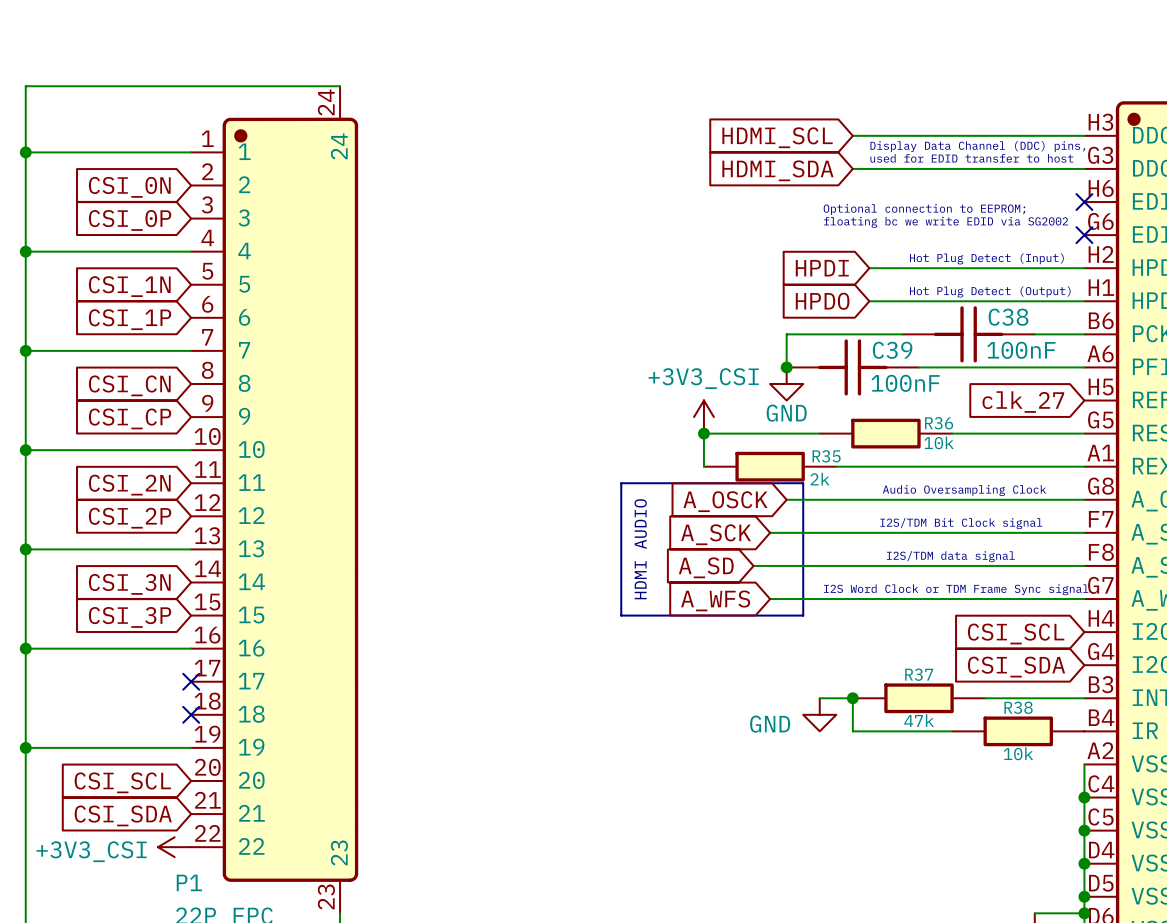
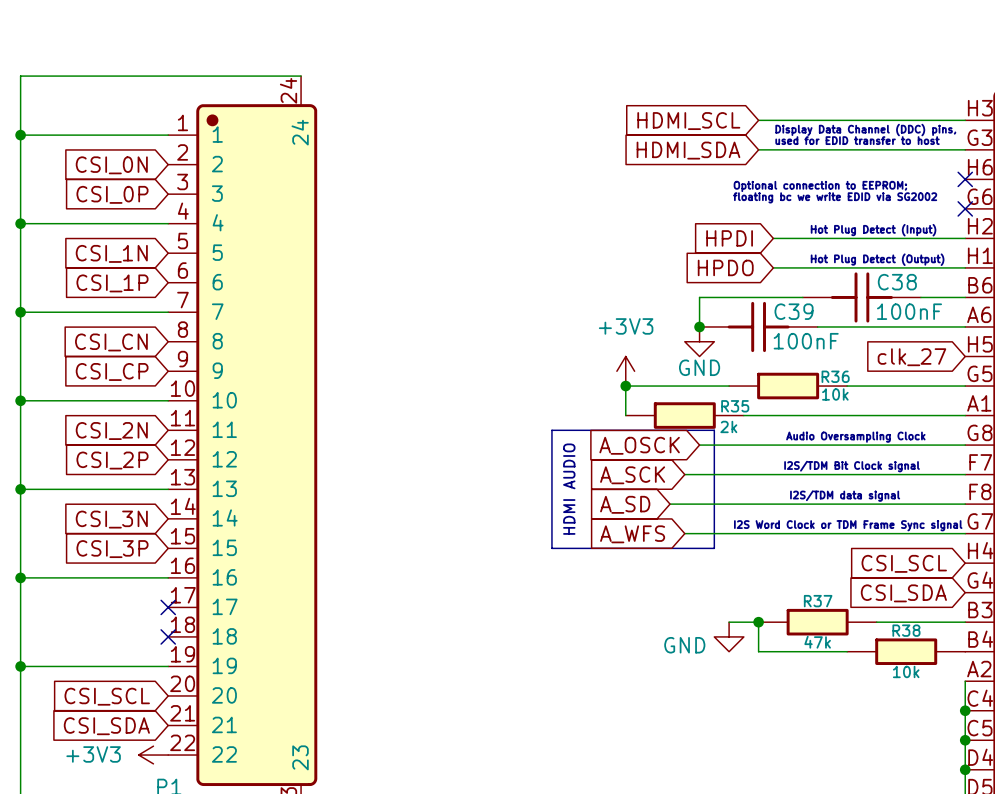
power symbol: +3V3_CSI (703, 417) -> +3V3 (625, 371)
power symbol: +3V3_CSI (174, 847) -> +3V3 (153, 755)

